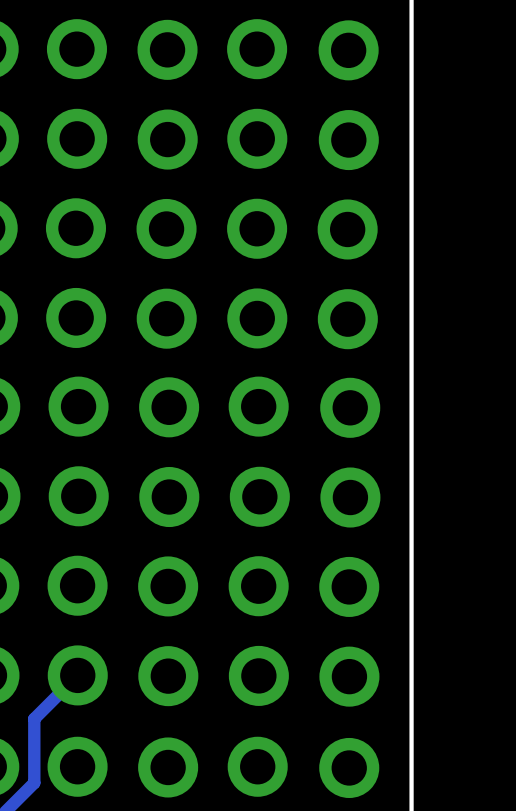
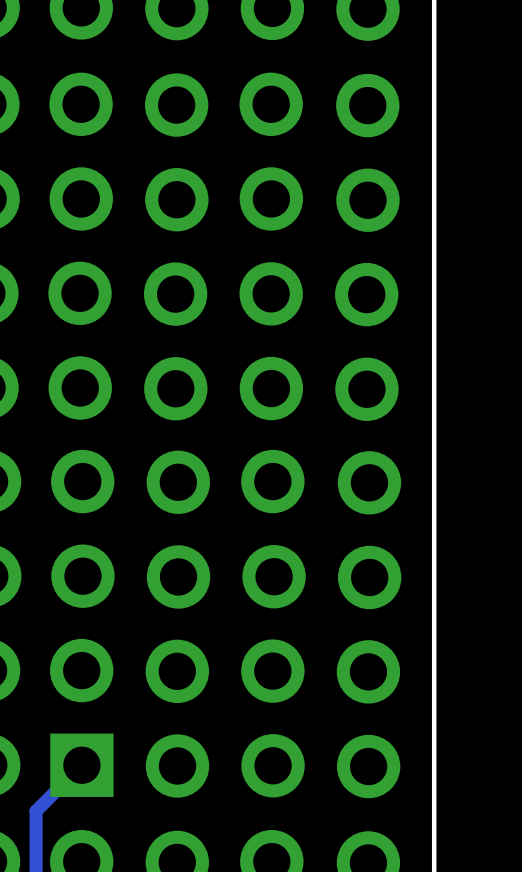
part footprint: [47, 645, 108, 706] -> [50, 733, 114, 797]

